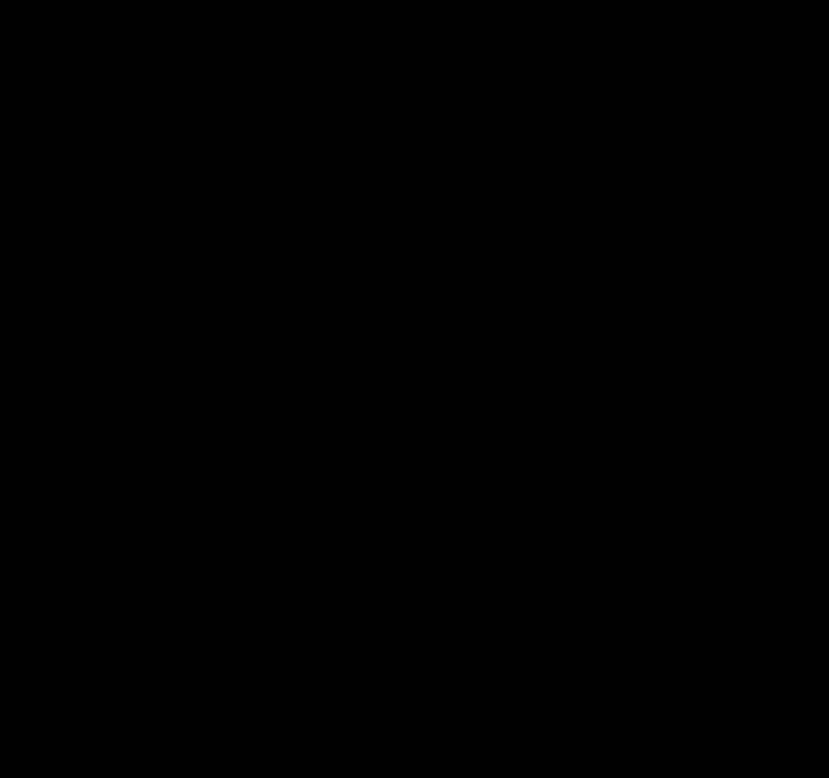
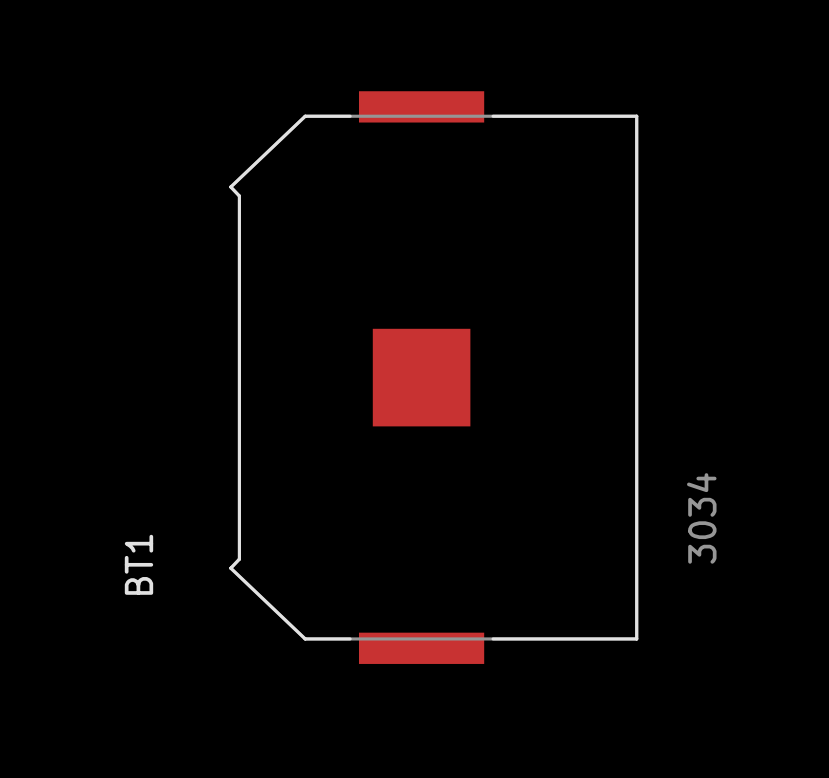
BT1: none -> 3034 (433, 377)

